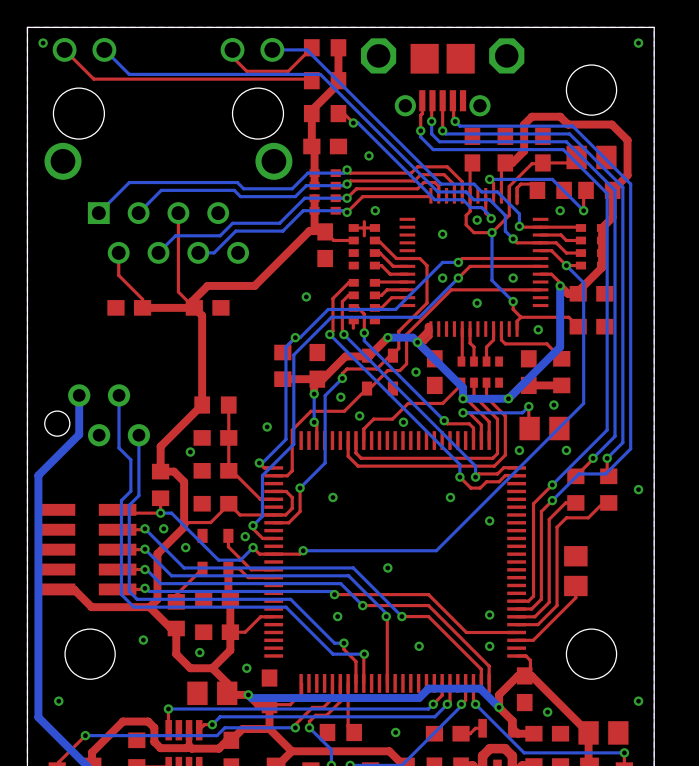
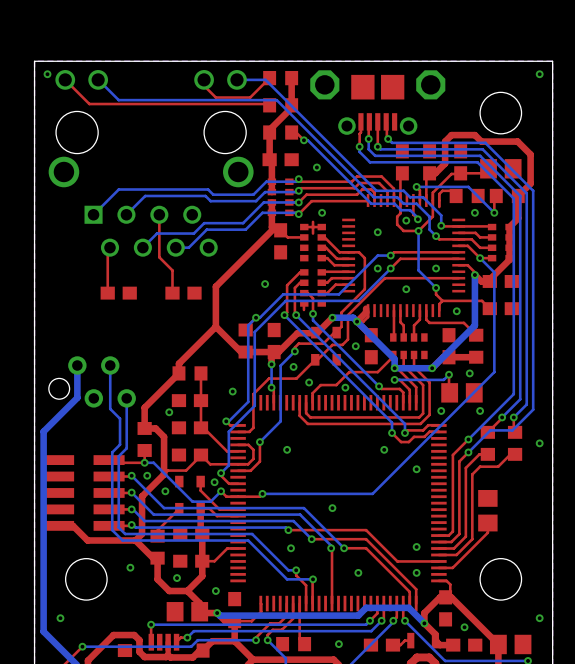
top track: none -> (272, 230) (215, 286) (215, 326)
top track: (325, 231) (309, 231) (254, 285) (207, 285) (191, 301) (191, 305) (202, 315) (202, 393) -> (215, 326) (178, 363)
top track: (118, 252) (118, 275) (142, 299) (142, 307) (194, 307) (178, 291) (178, 264) -> (110, 247) (107, 249) (107, 293)
top track: none -> (159, 257) (172, 270) (172, 293)
top track: none -> (215, 326) (241, 352) (245, 352)

